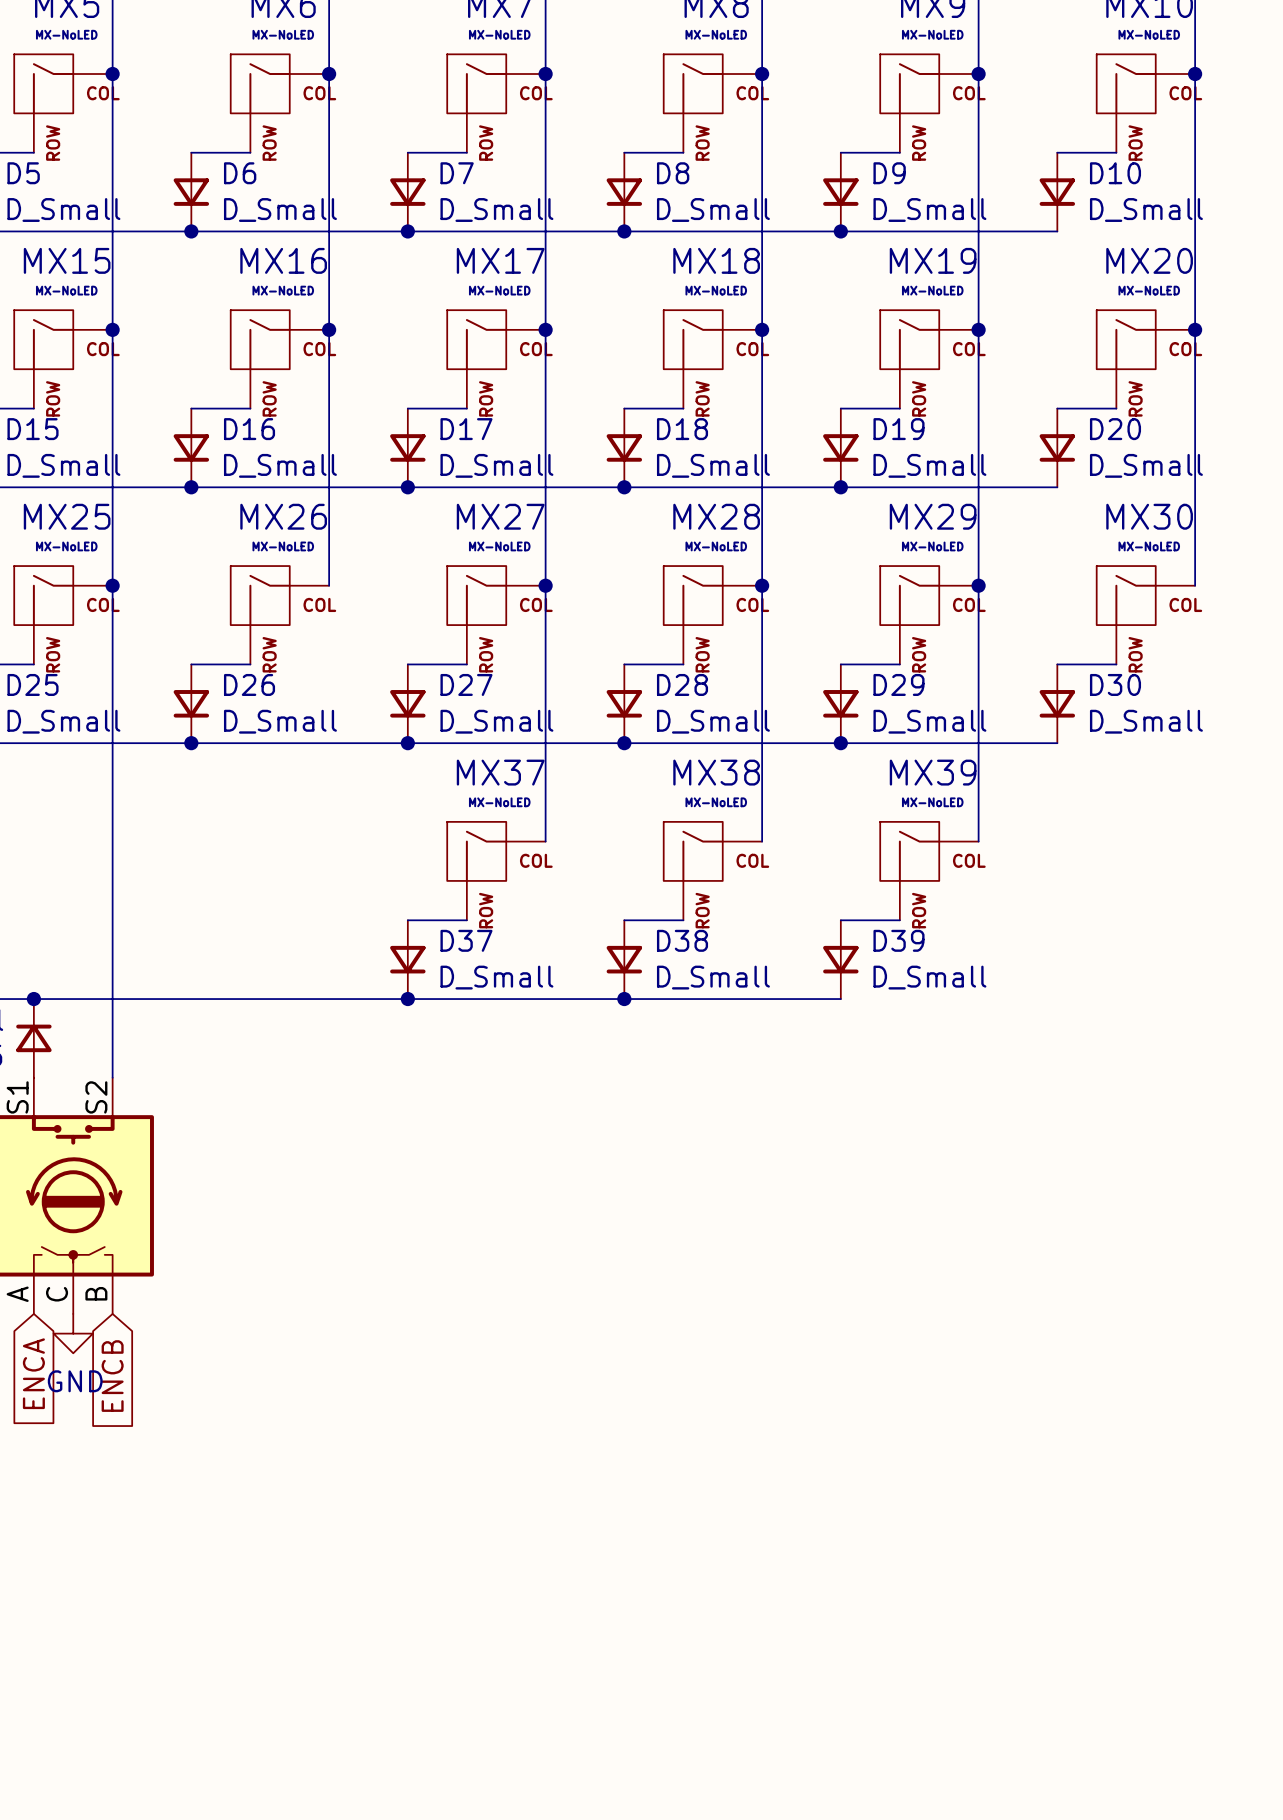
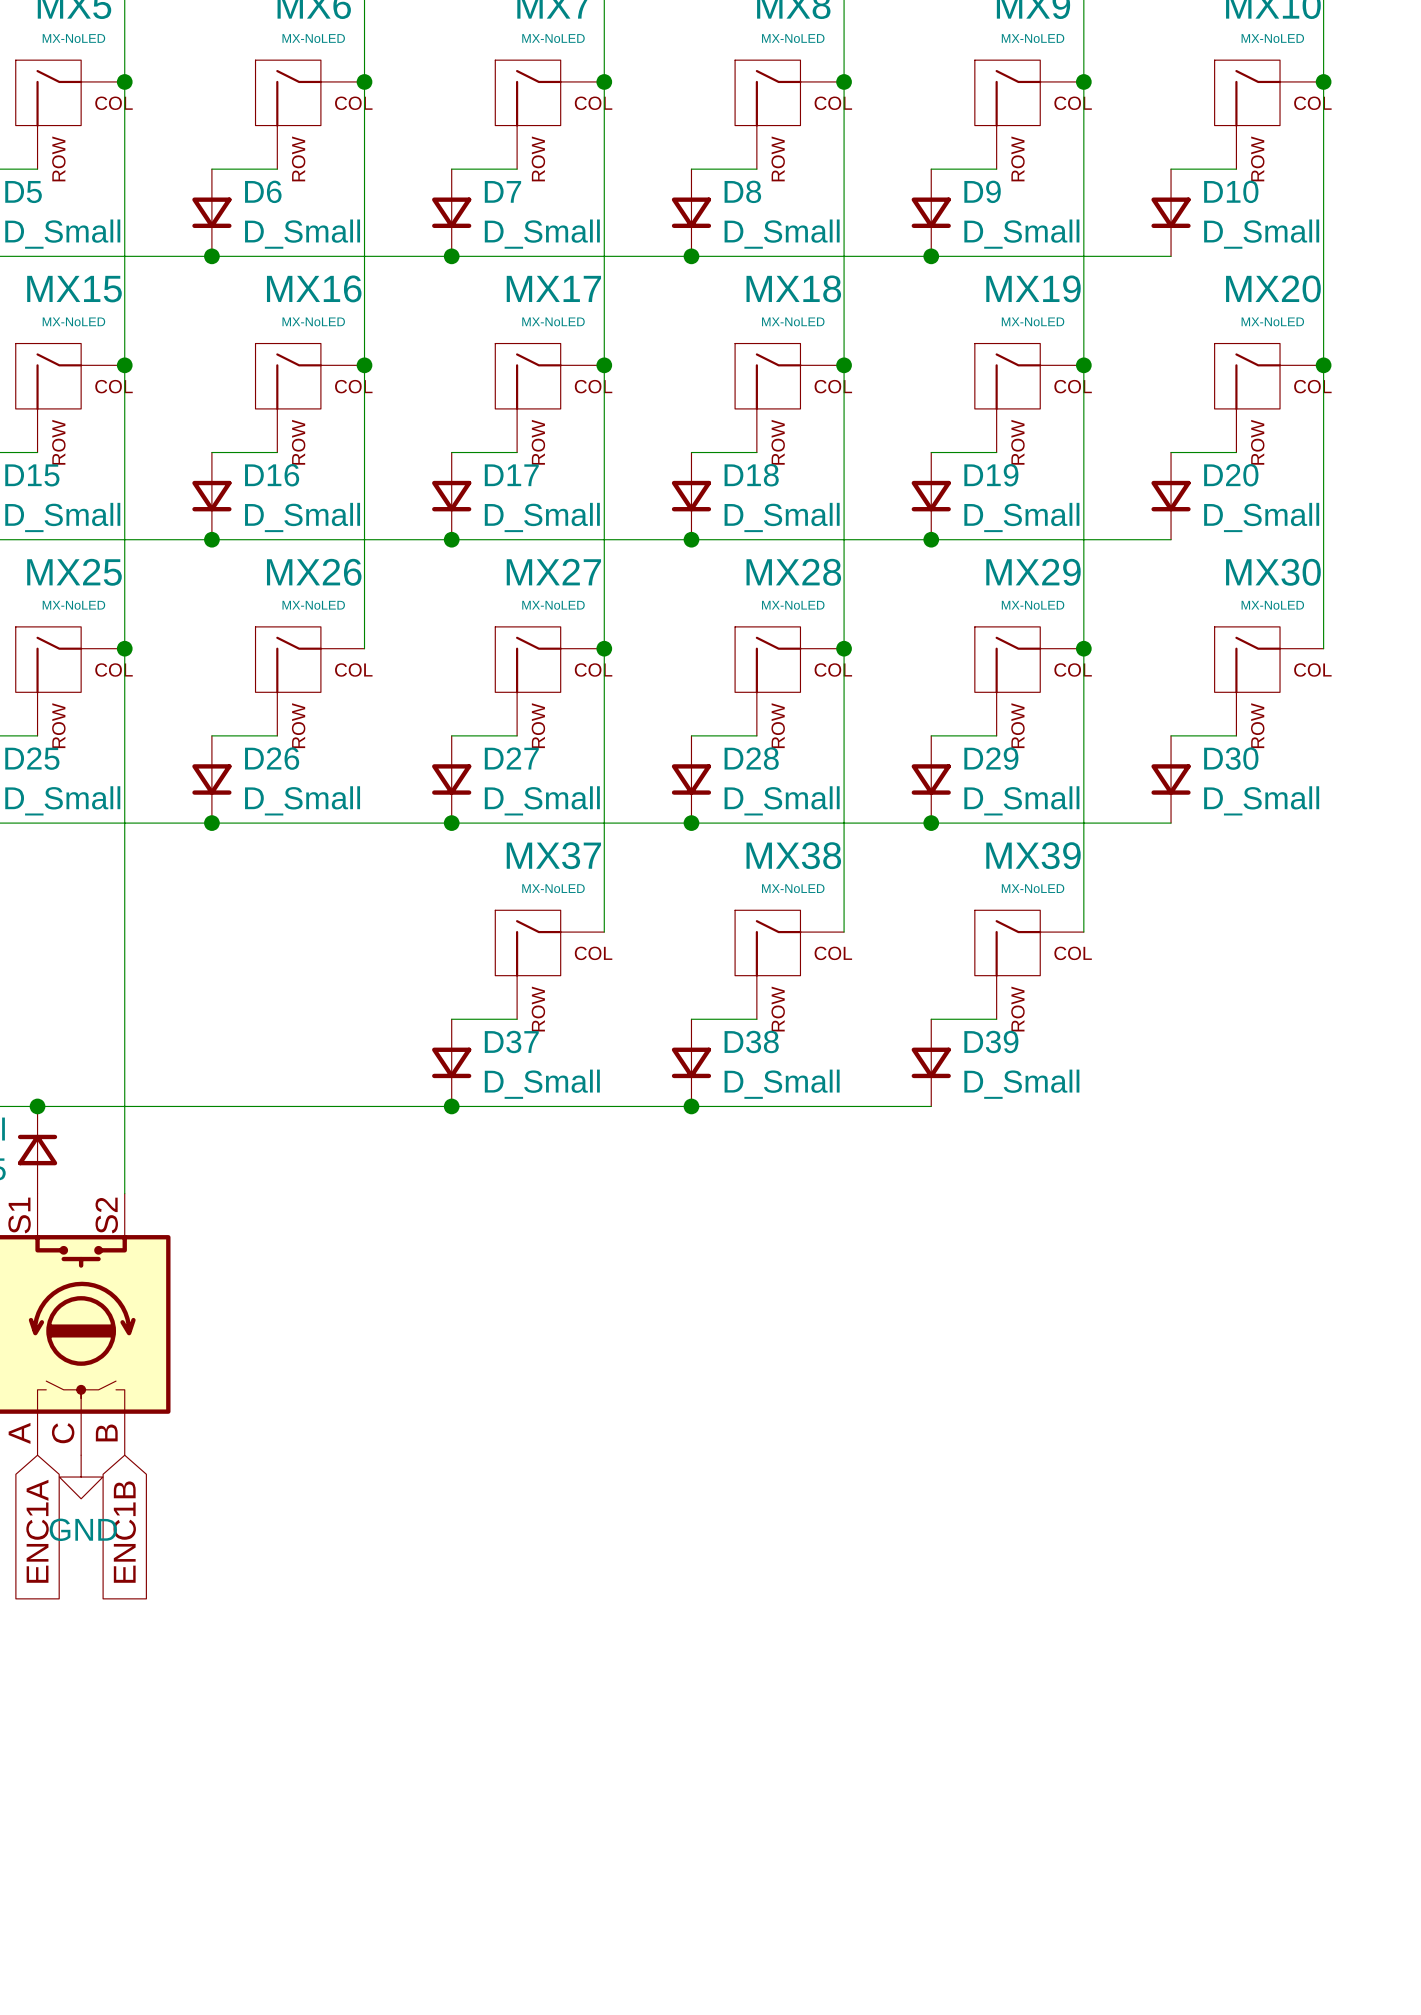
global label: ENCA (33, 1373) -> ENC1A (37, 1531)
global label: ENCB (112, 1376) -> ENC1B (124, 1532)

